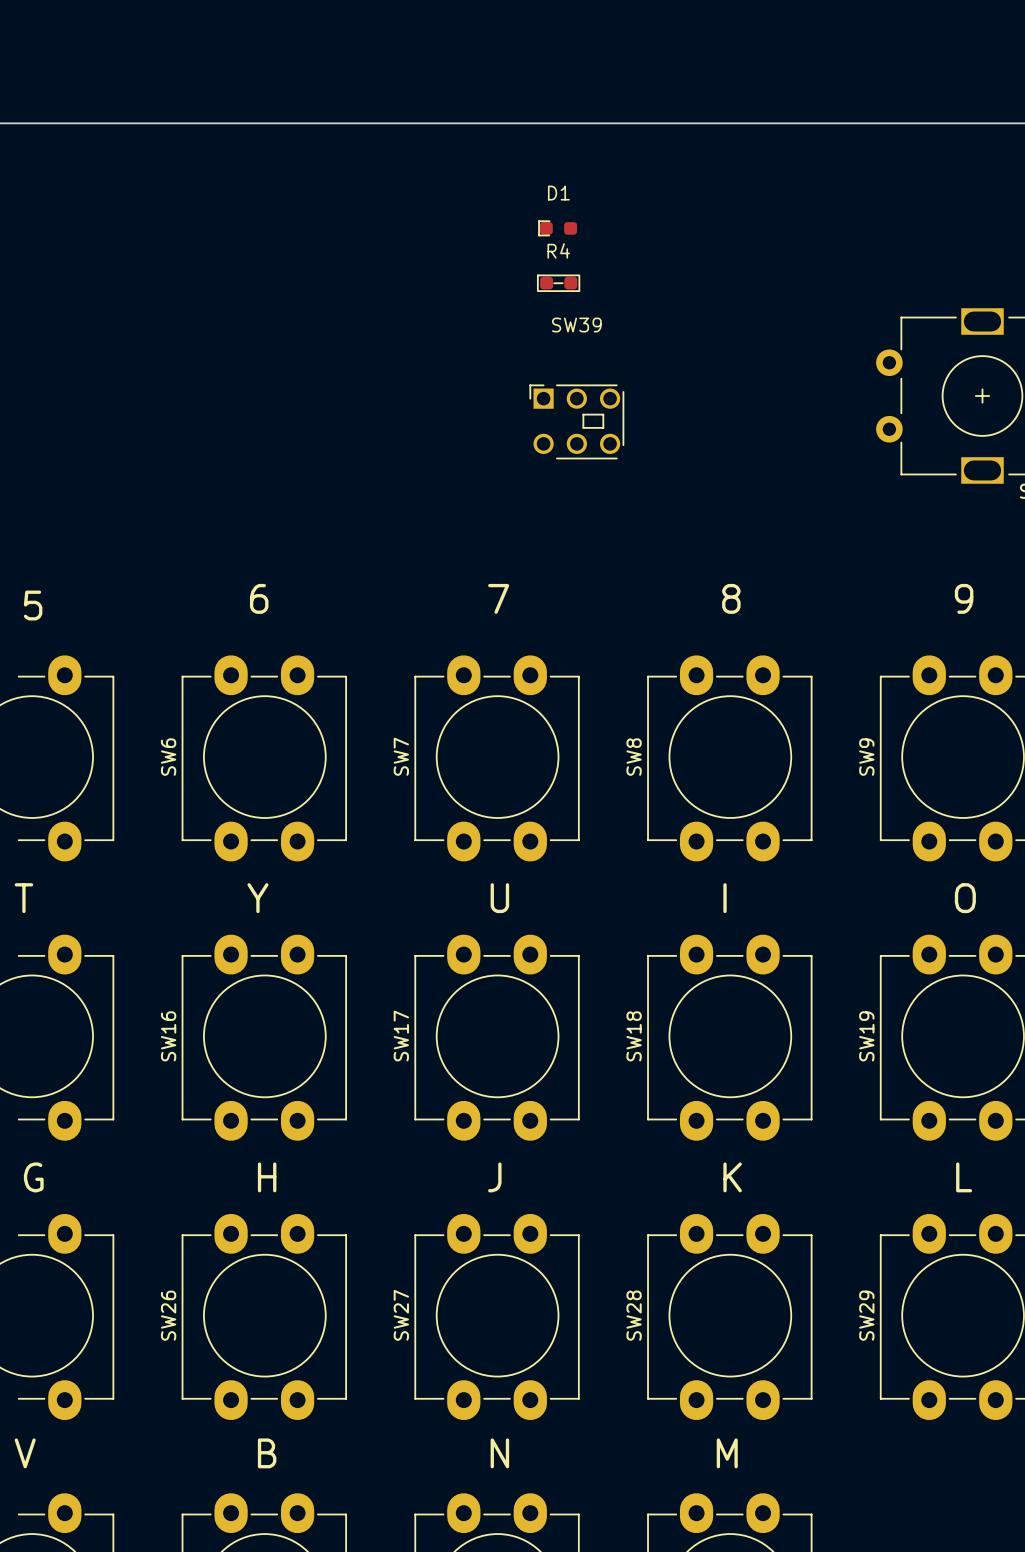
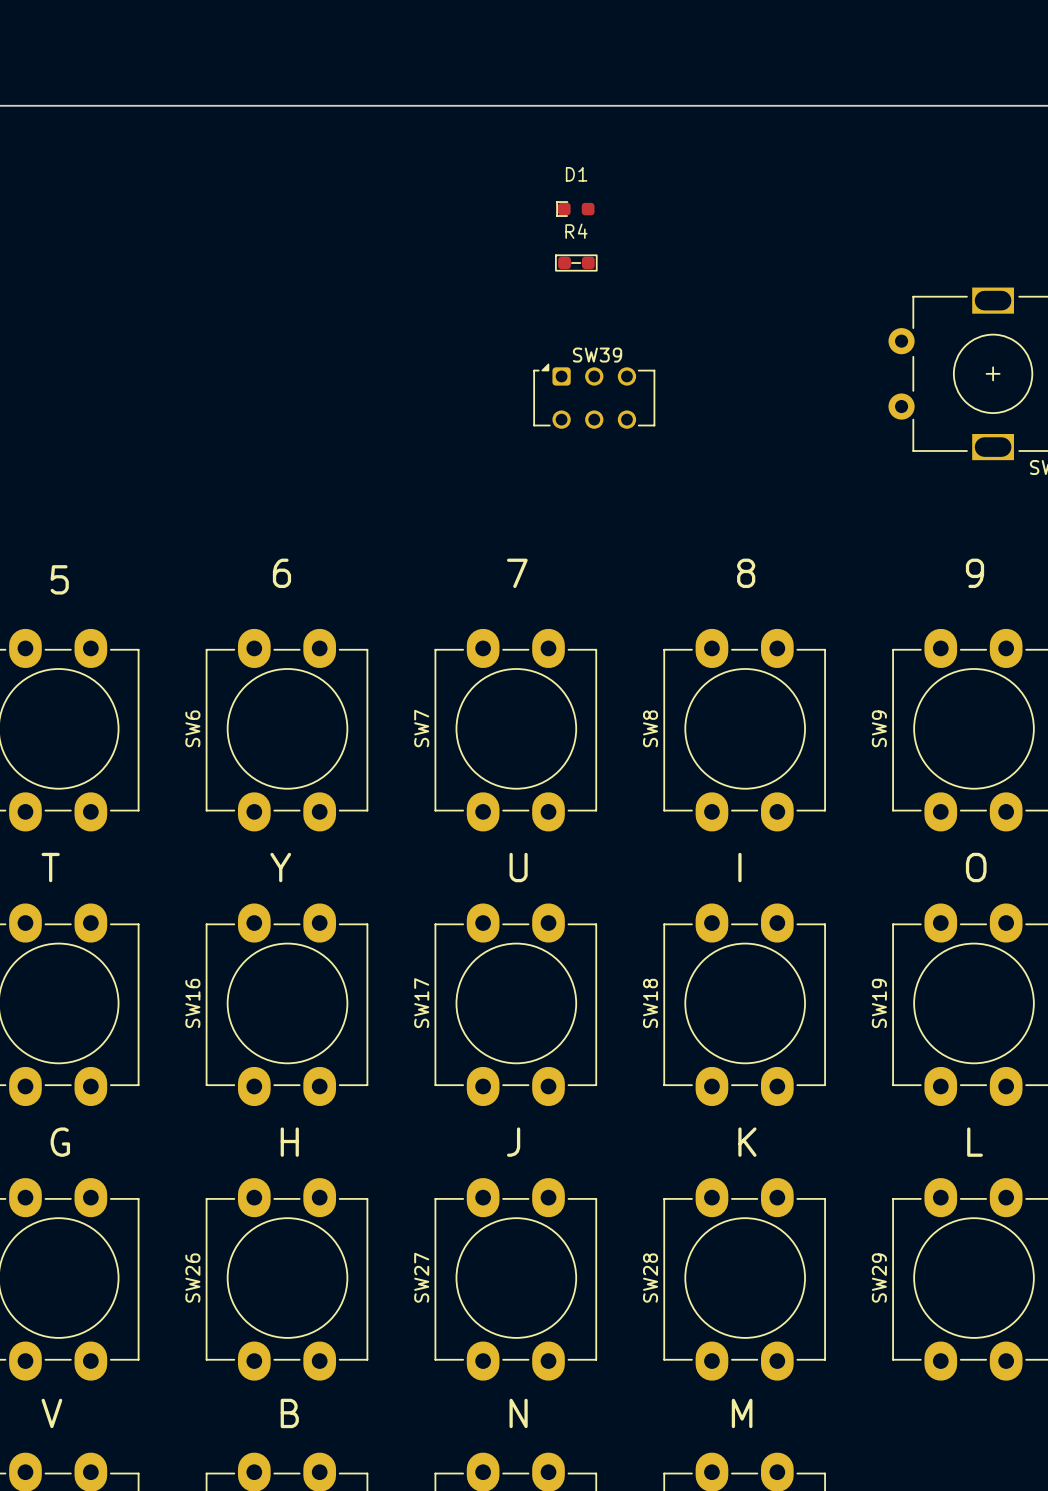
SW39 name position: SW39 (576, 325) -> SW39 (597, 355)
SW39 footprint: [529, 384, 625, 460] -> [533, 363, 656, 429]

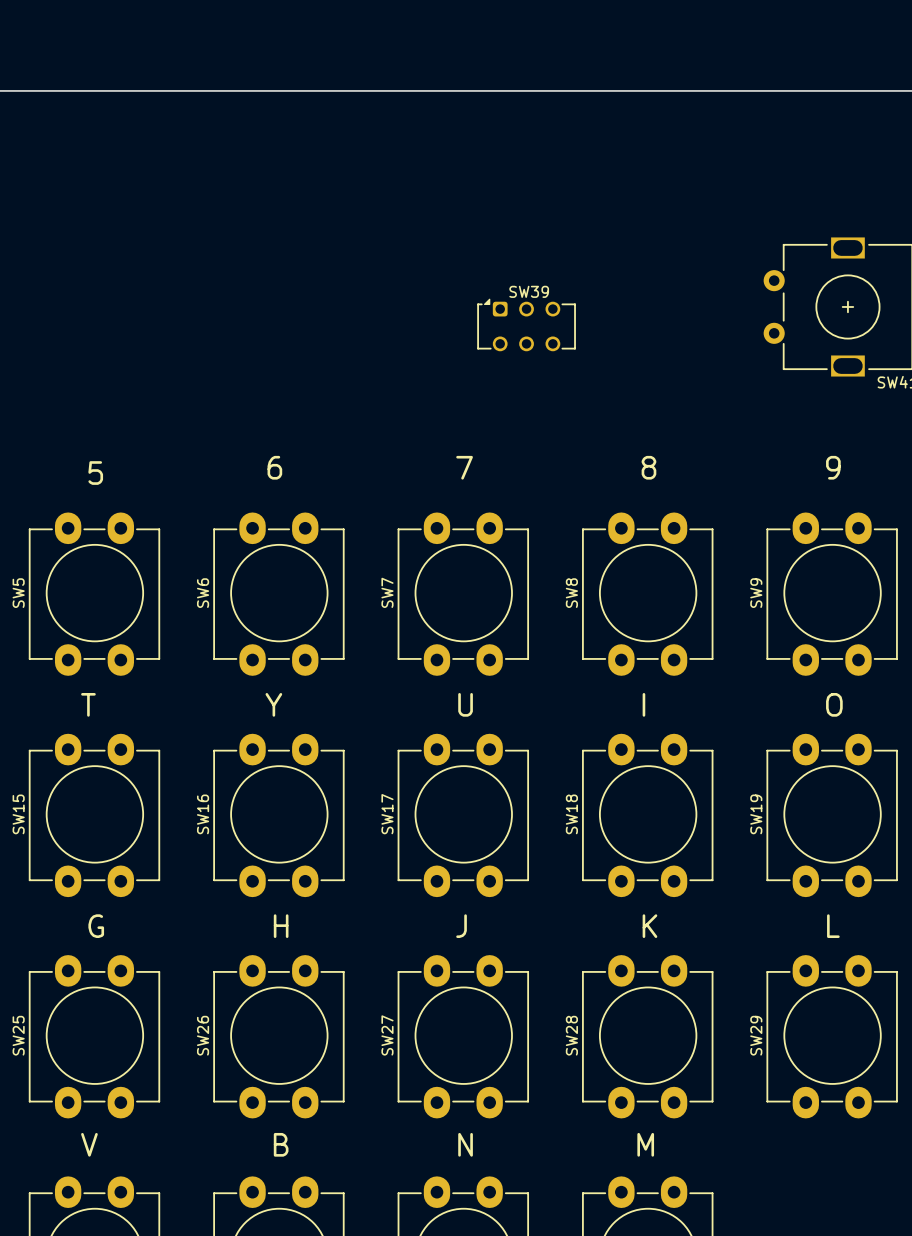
D1: (575, 209) -> none
R4: (576, 263) -> none

